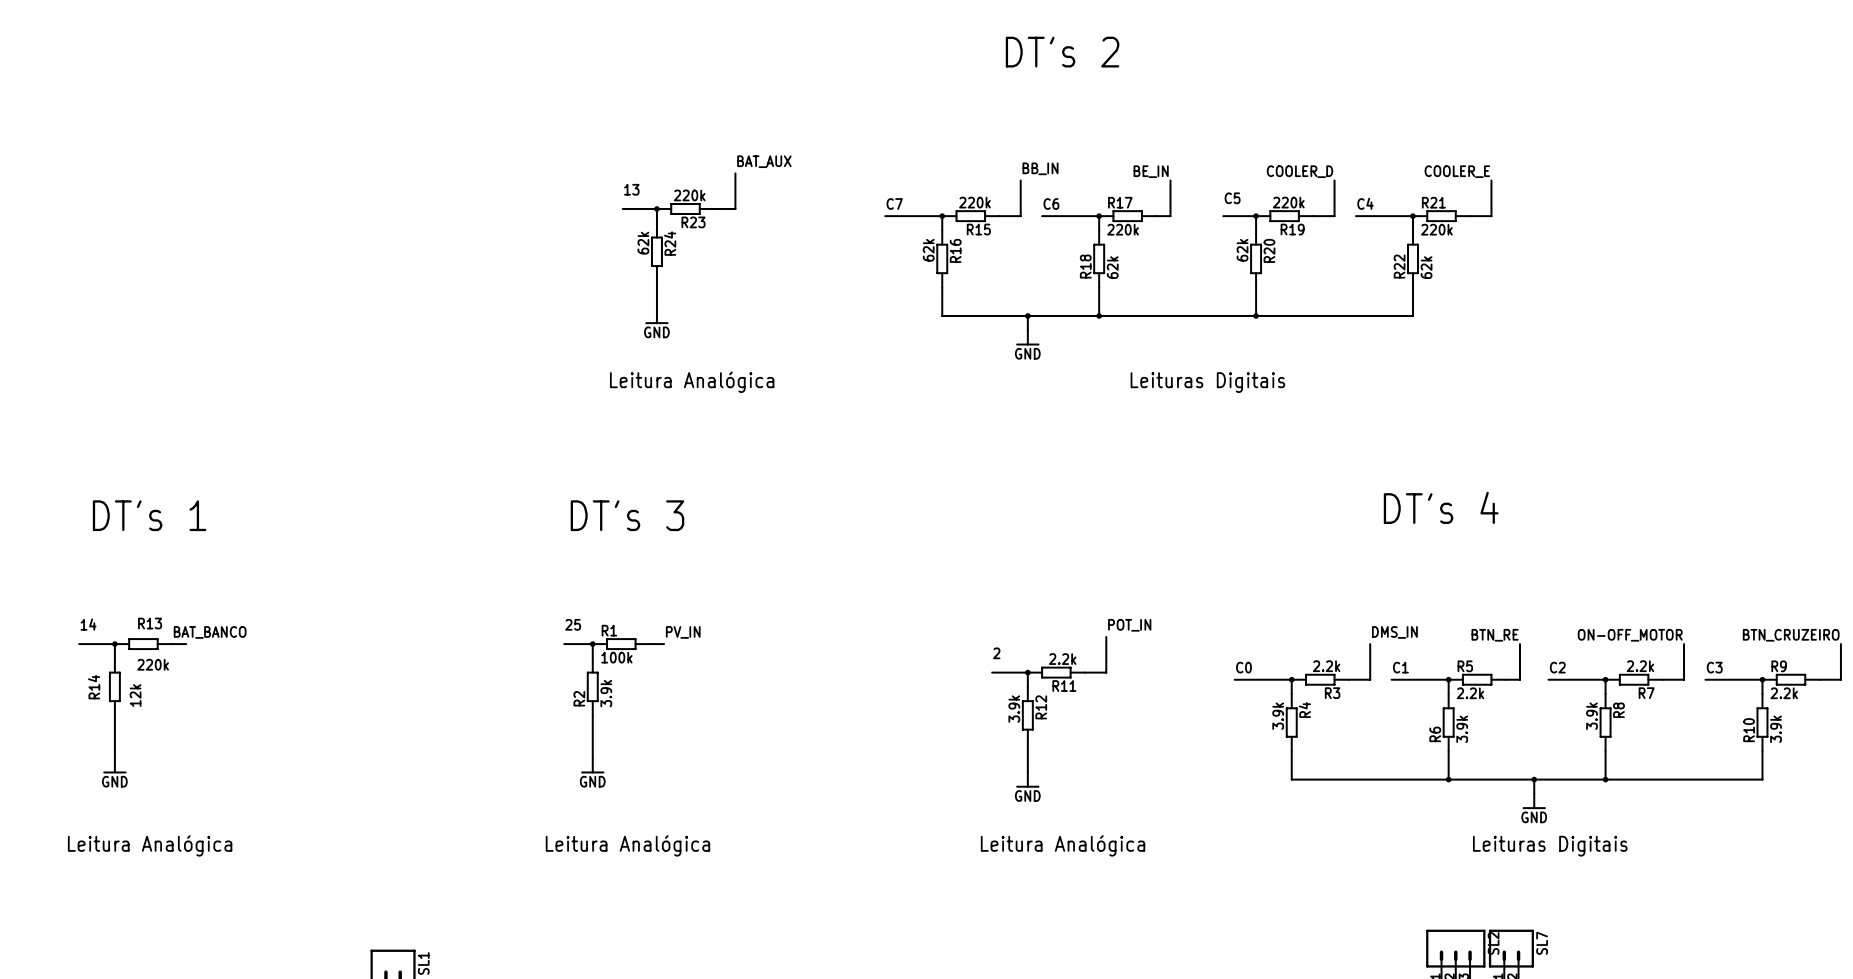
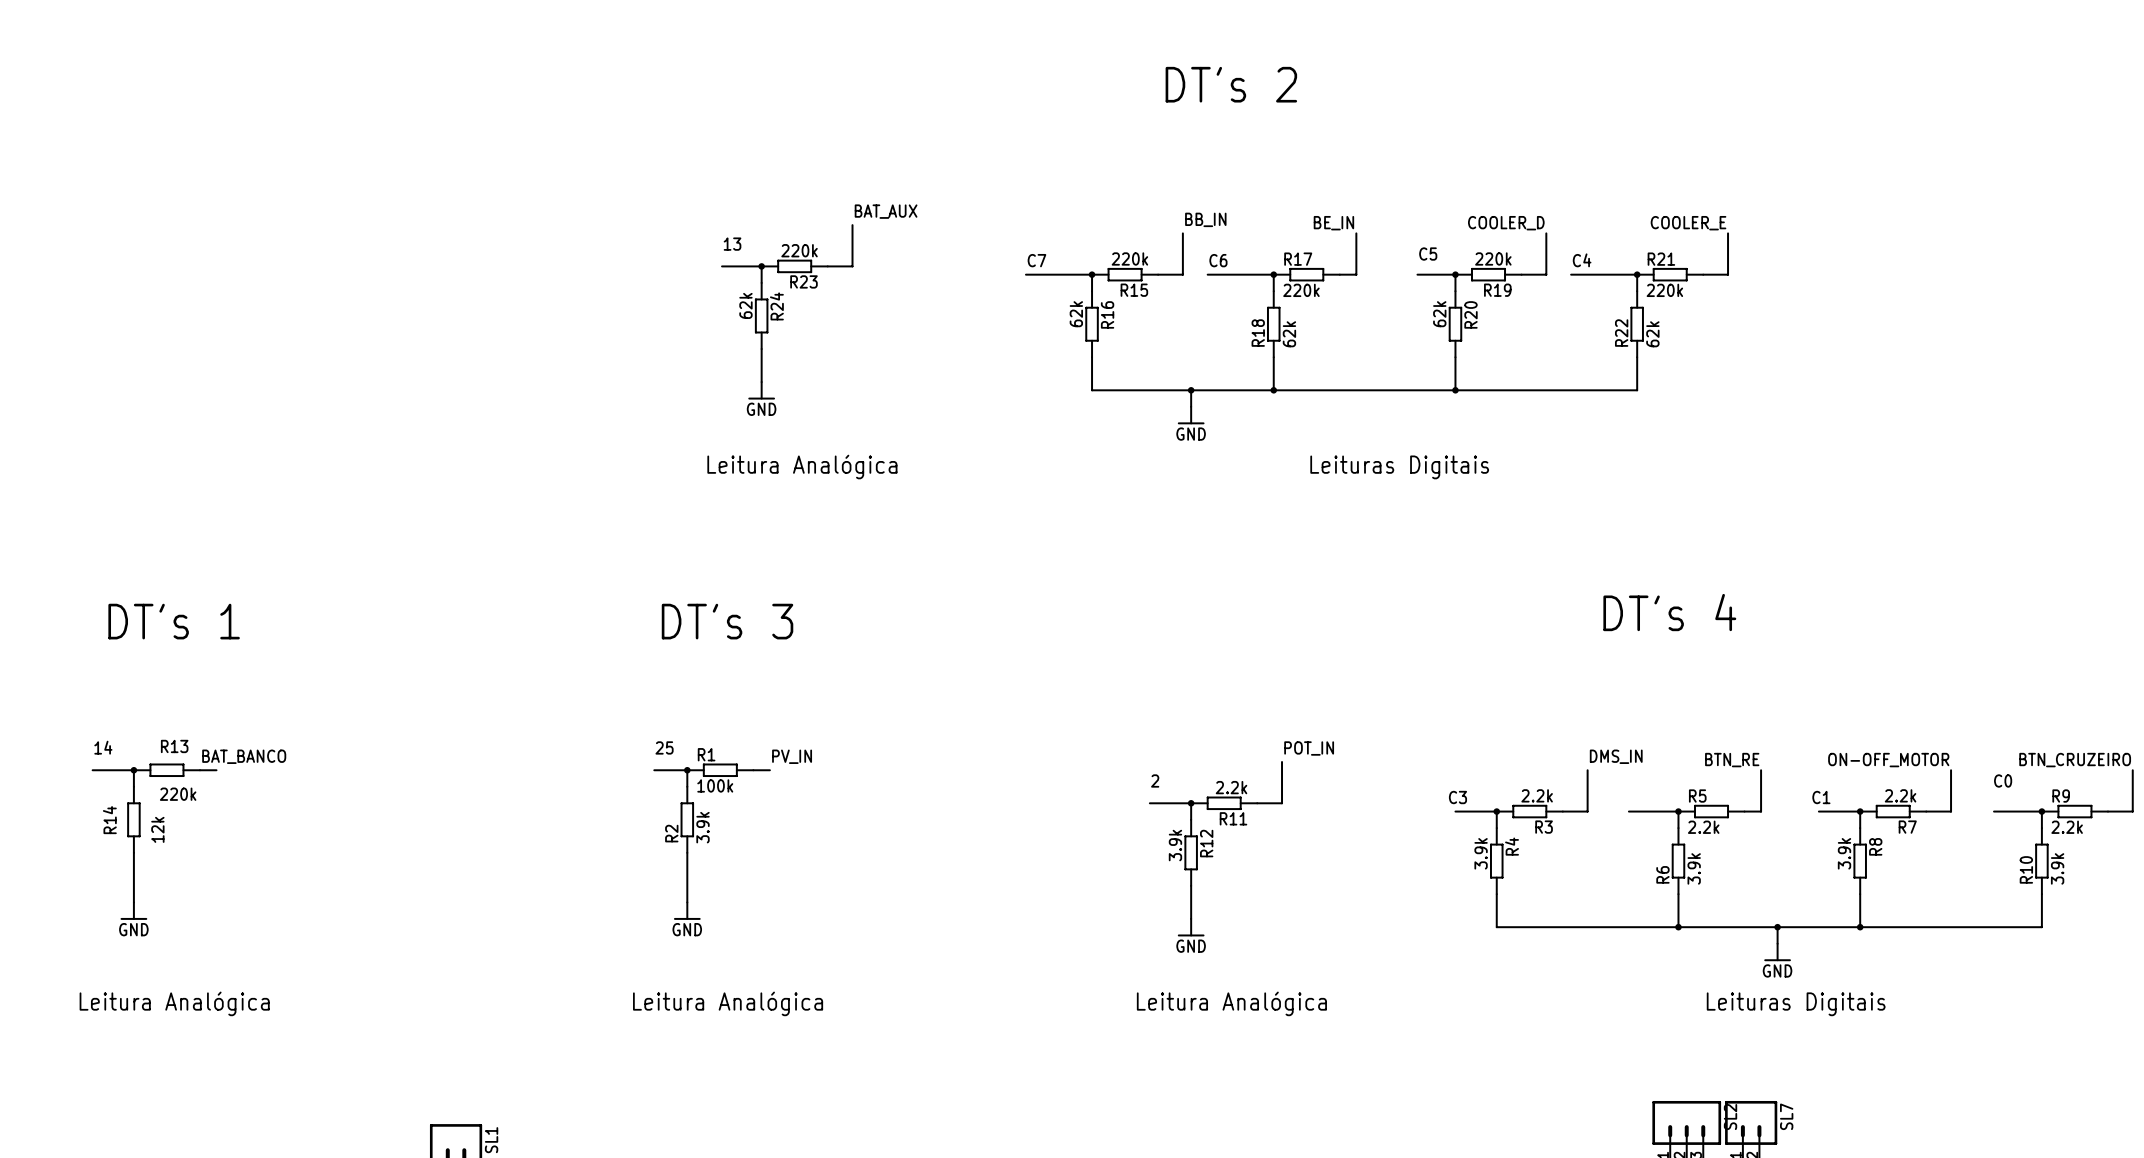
label: none -> C0 (2003, 780)
label: C0 (1243, 667) -> none
label: none -> C3 (1457, 797)
label: C1 (1400, 667) -> none
label: C2 (1557, 667) -> none
label: none -> C1 (1821, 797)
label: C3 (1714, 667) -> none
wire: (1234, 679) (1256, 679) -> none
wire: (1391, 679) (1405, 679) -> none
wire: (1548, 679) (1569, 679) -> none
wire: (1705, 679) (1721, 679) -> none

